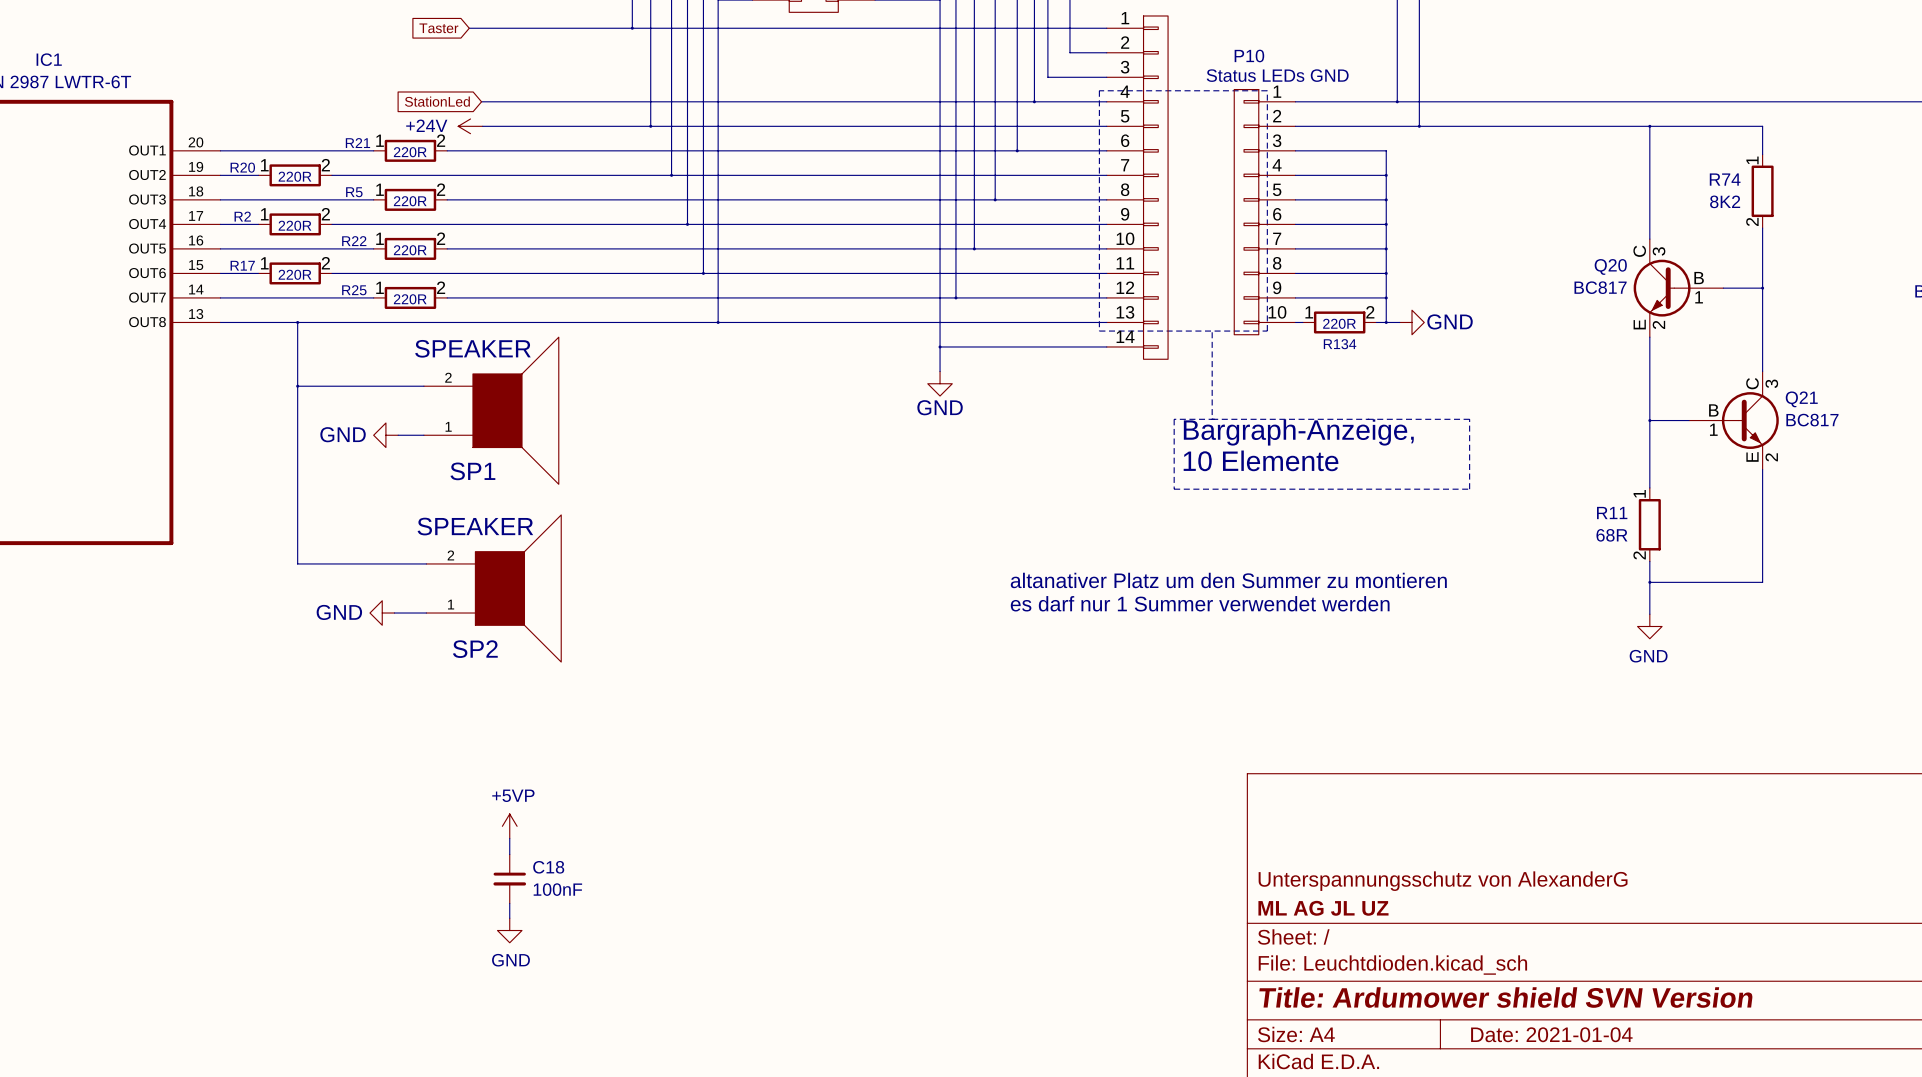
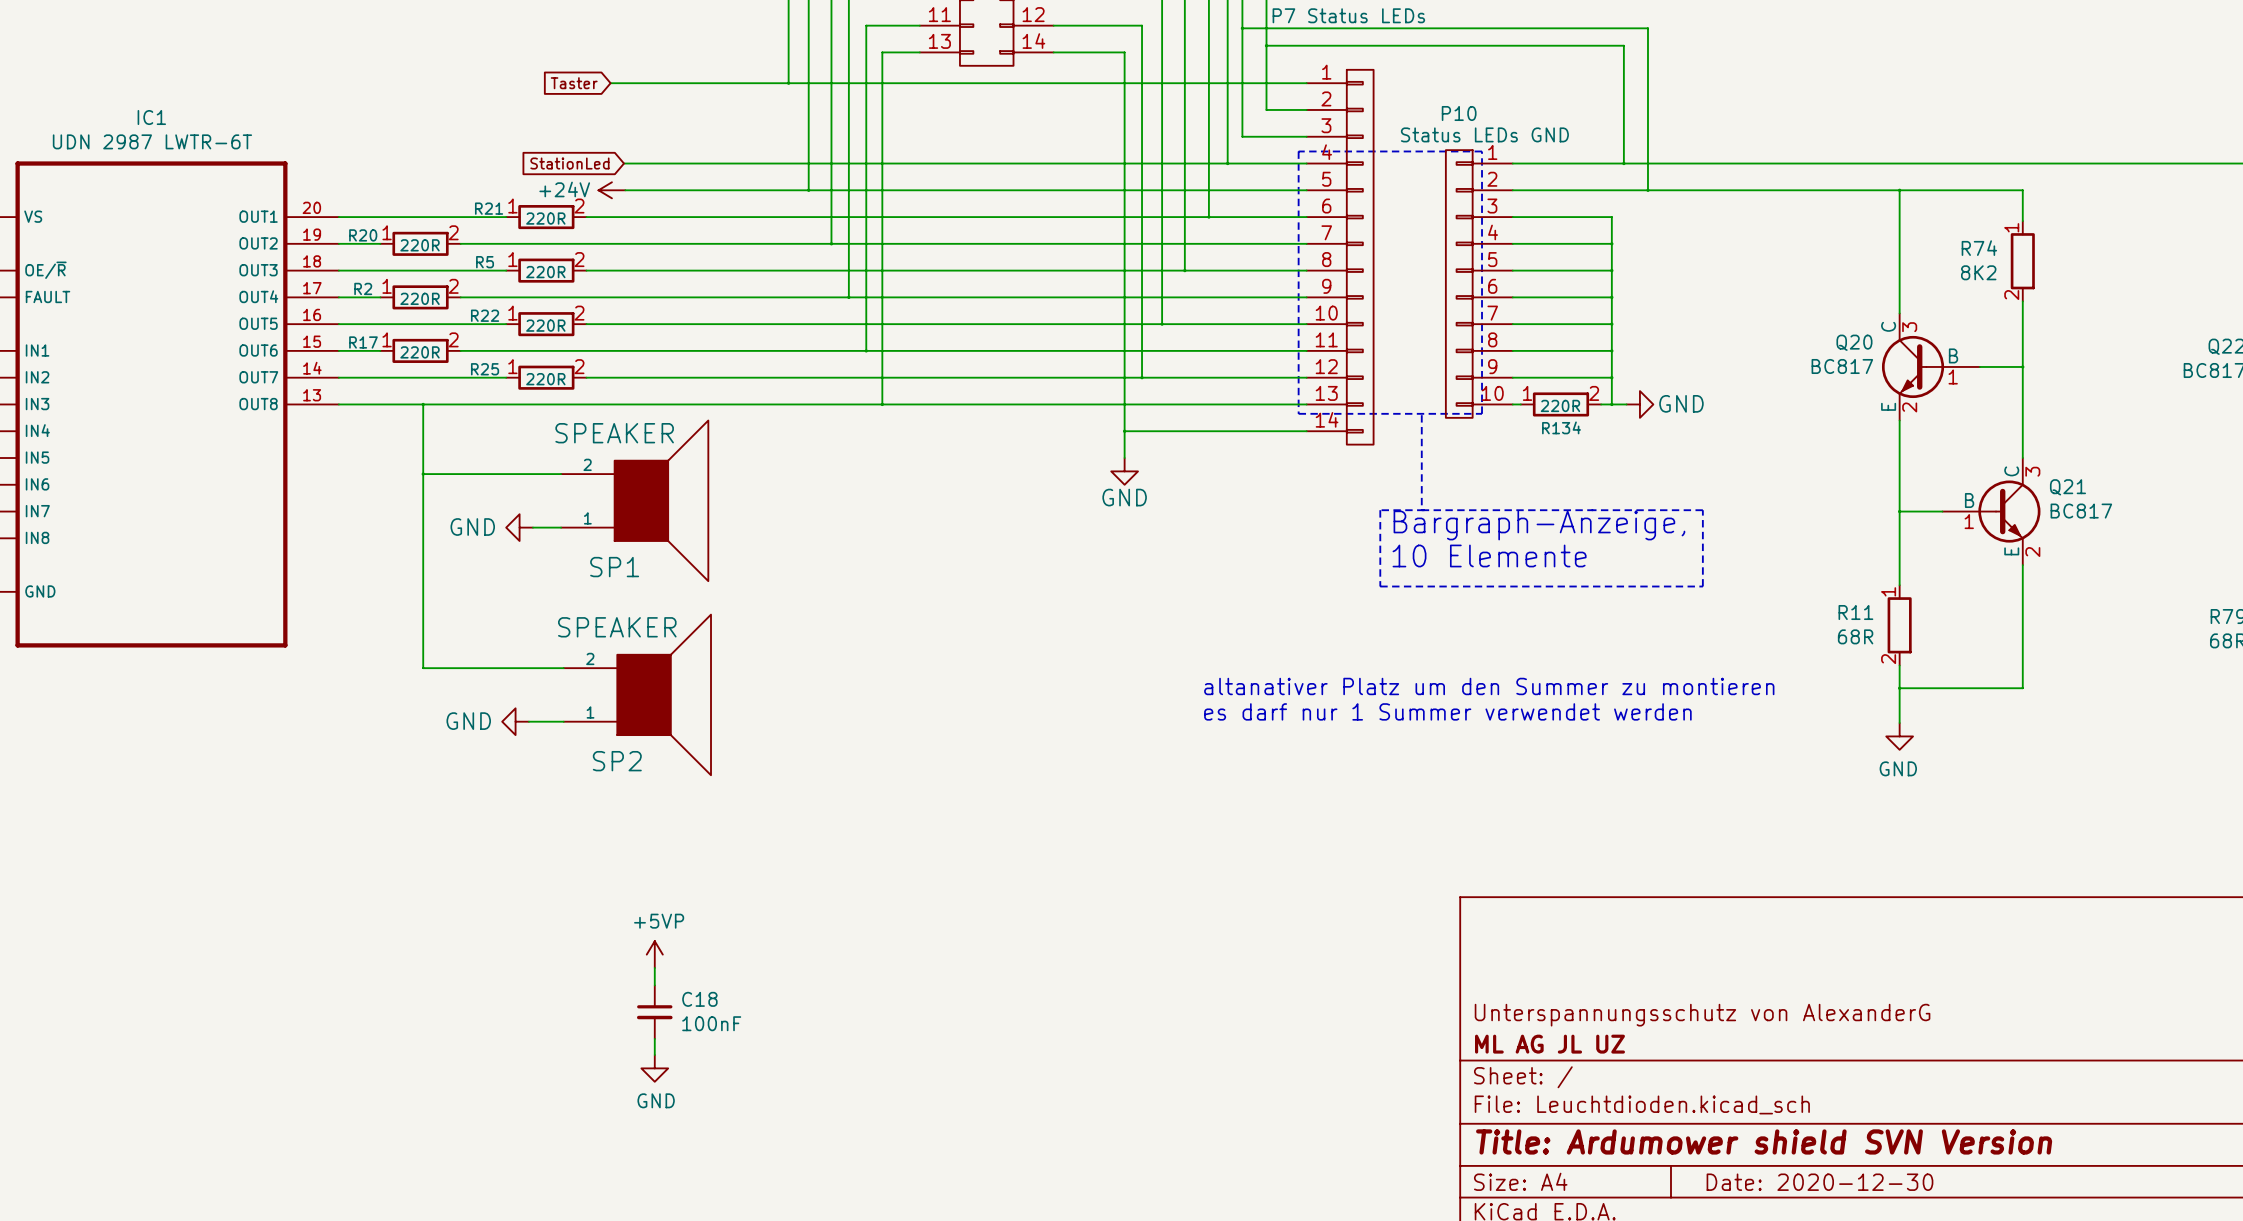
title block: Date: 2021-01-04 (1551, 1034) -> Date: 2020-12-30 (1819, 1182)

